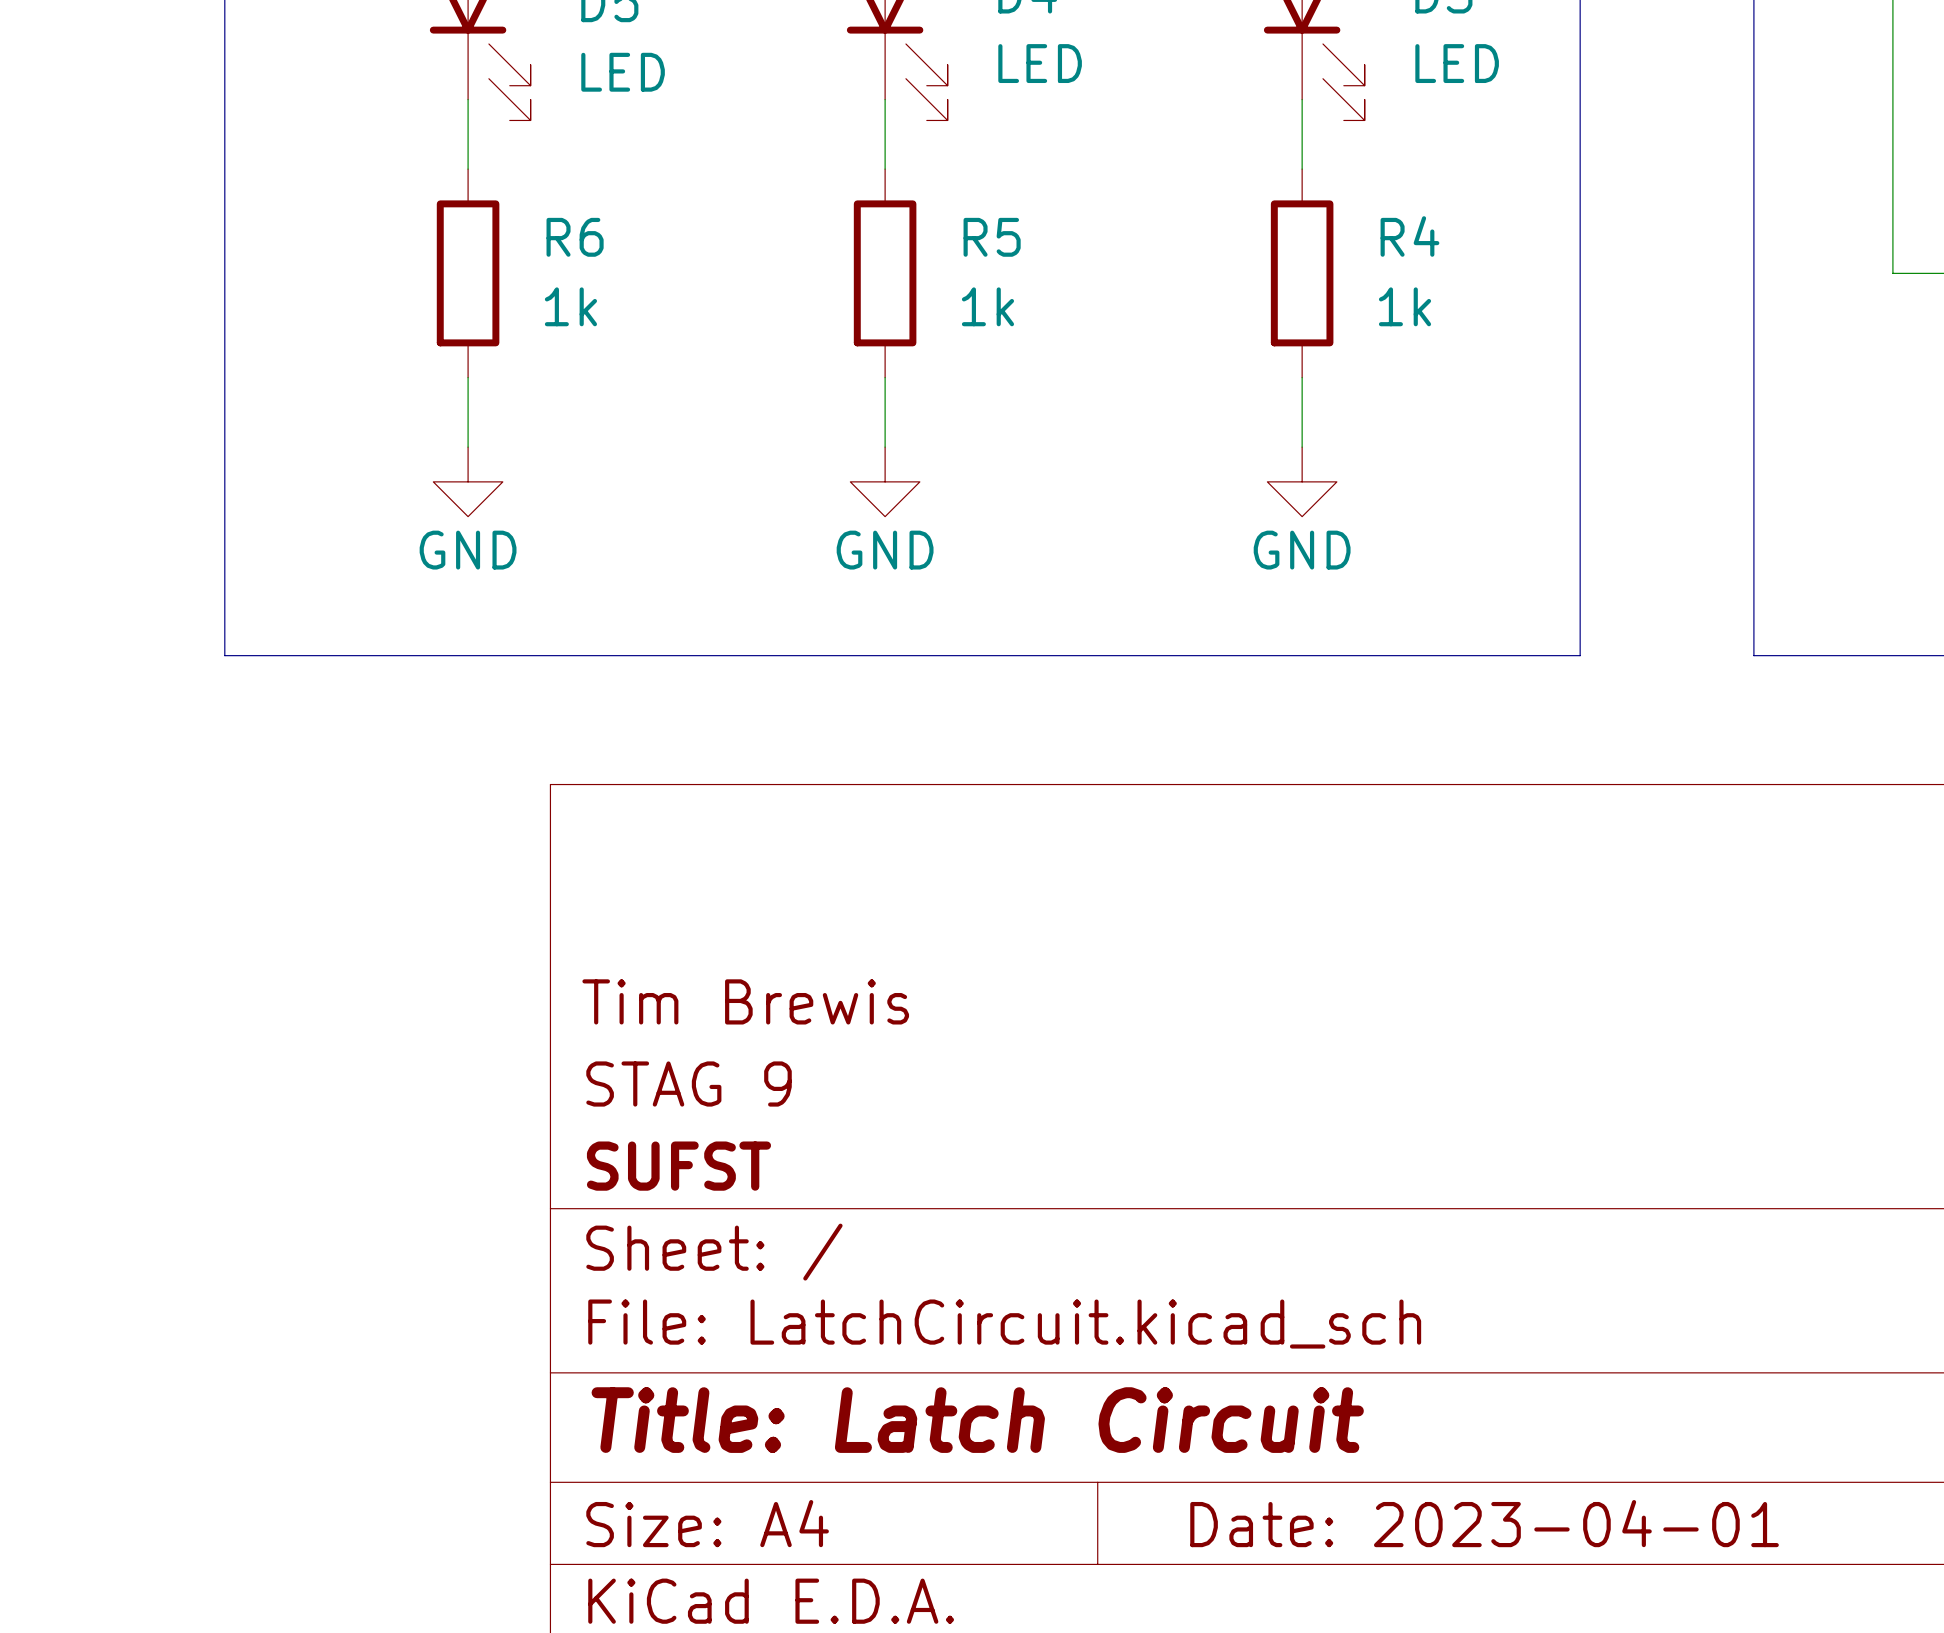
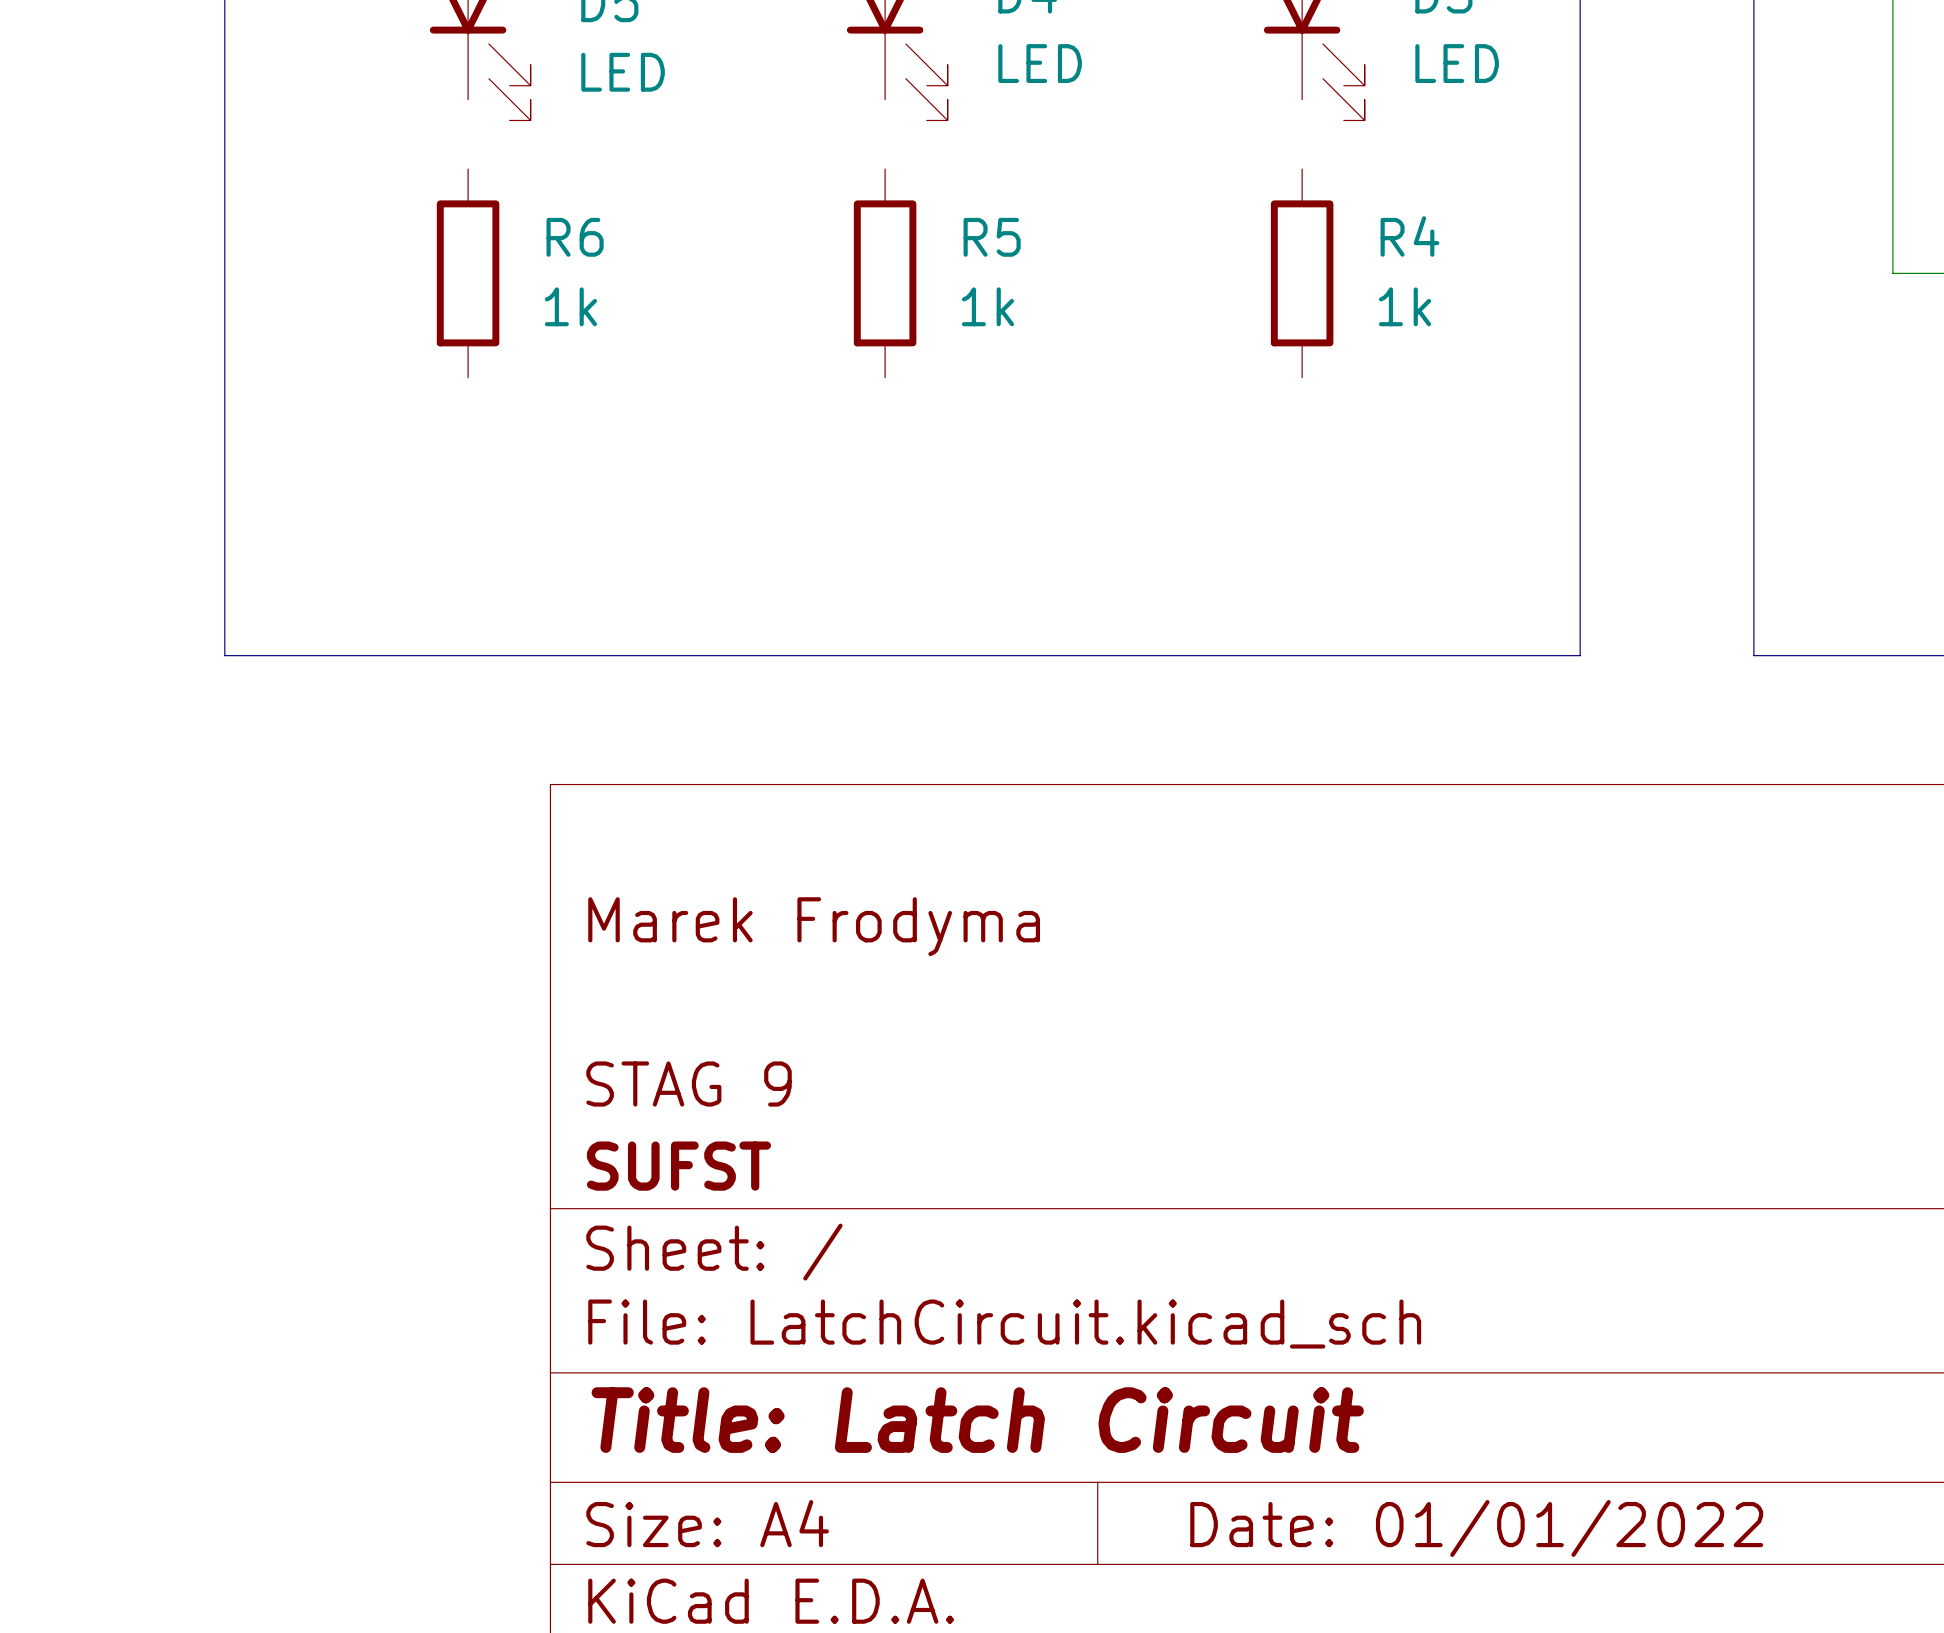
wire: (468, 99) (468, 169) -> none
wire: (885, 99) (885, 169) -> none
wire: (1302, 99) (1302, 169) -> none
wire: (468, 377) (468, 447) -> none
wire: (885, 377) (885, 447) -> none
wire: (1302, 377) (1302, 447) -> none
power symbol: GND (468, 481) -> none
power symbol: GND (885, 481) -> none
power symbol: GND (1302, 481) -> none
title block: none -> Marek Frodyma (814, 926)
title block: Tim Brewis (745, 1001) -> none
title block: Date: 2023-04-01 (1484, 1523) -> Date: 01/01/2022 (1476, 1528)

